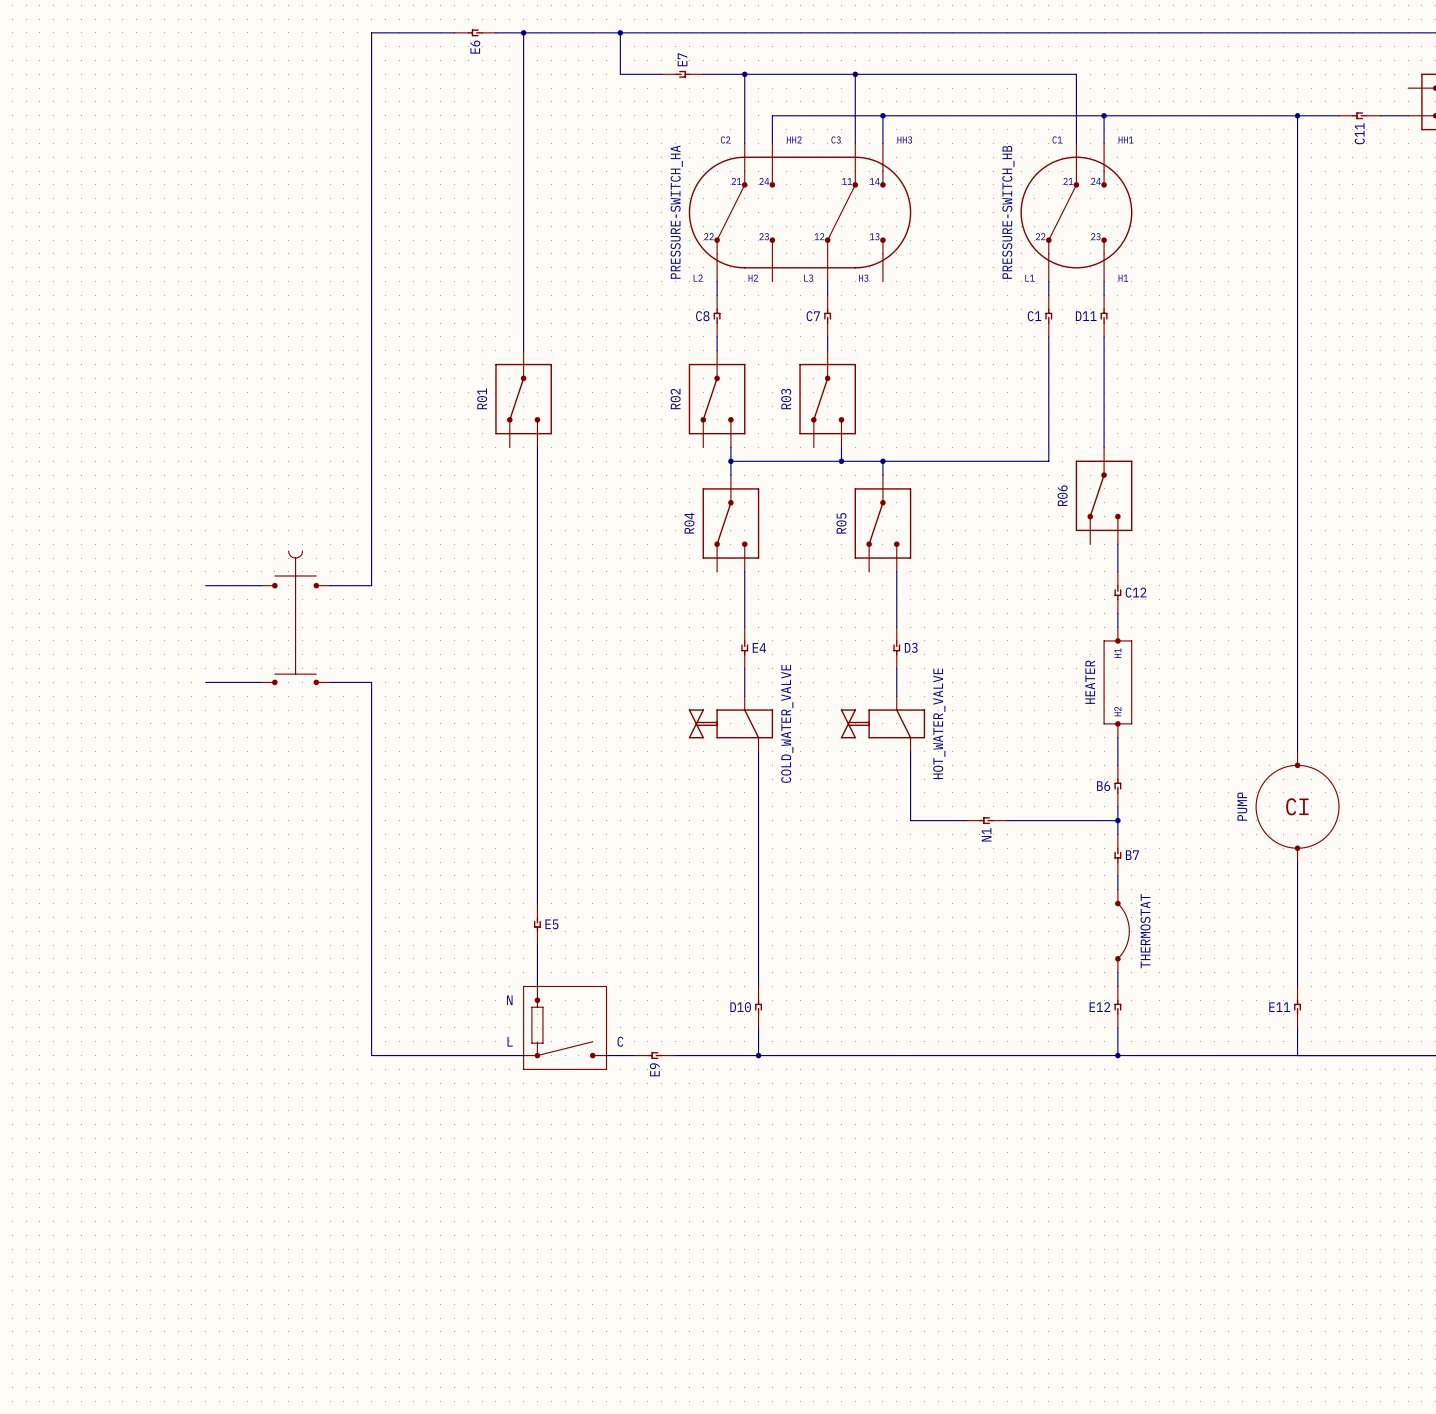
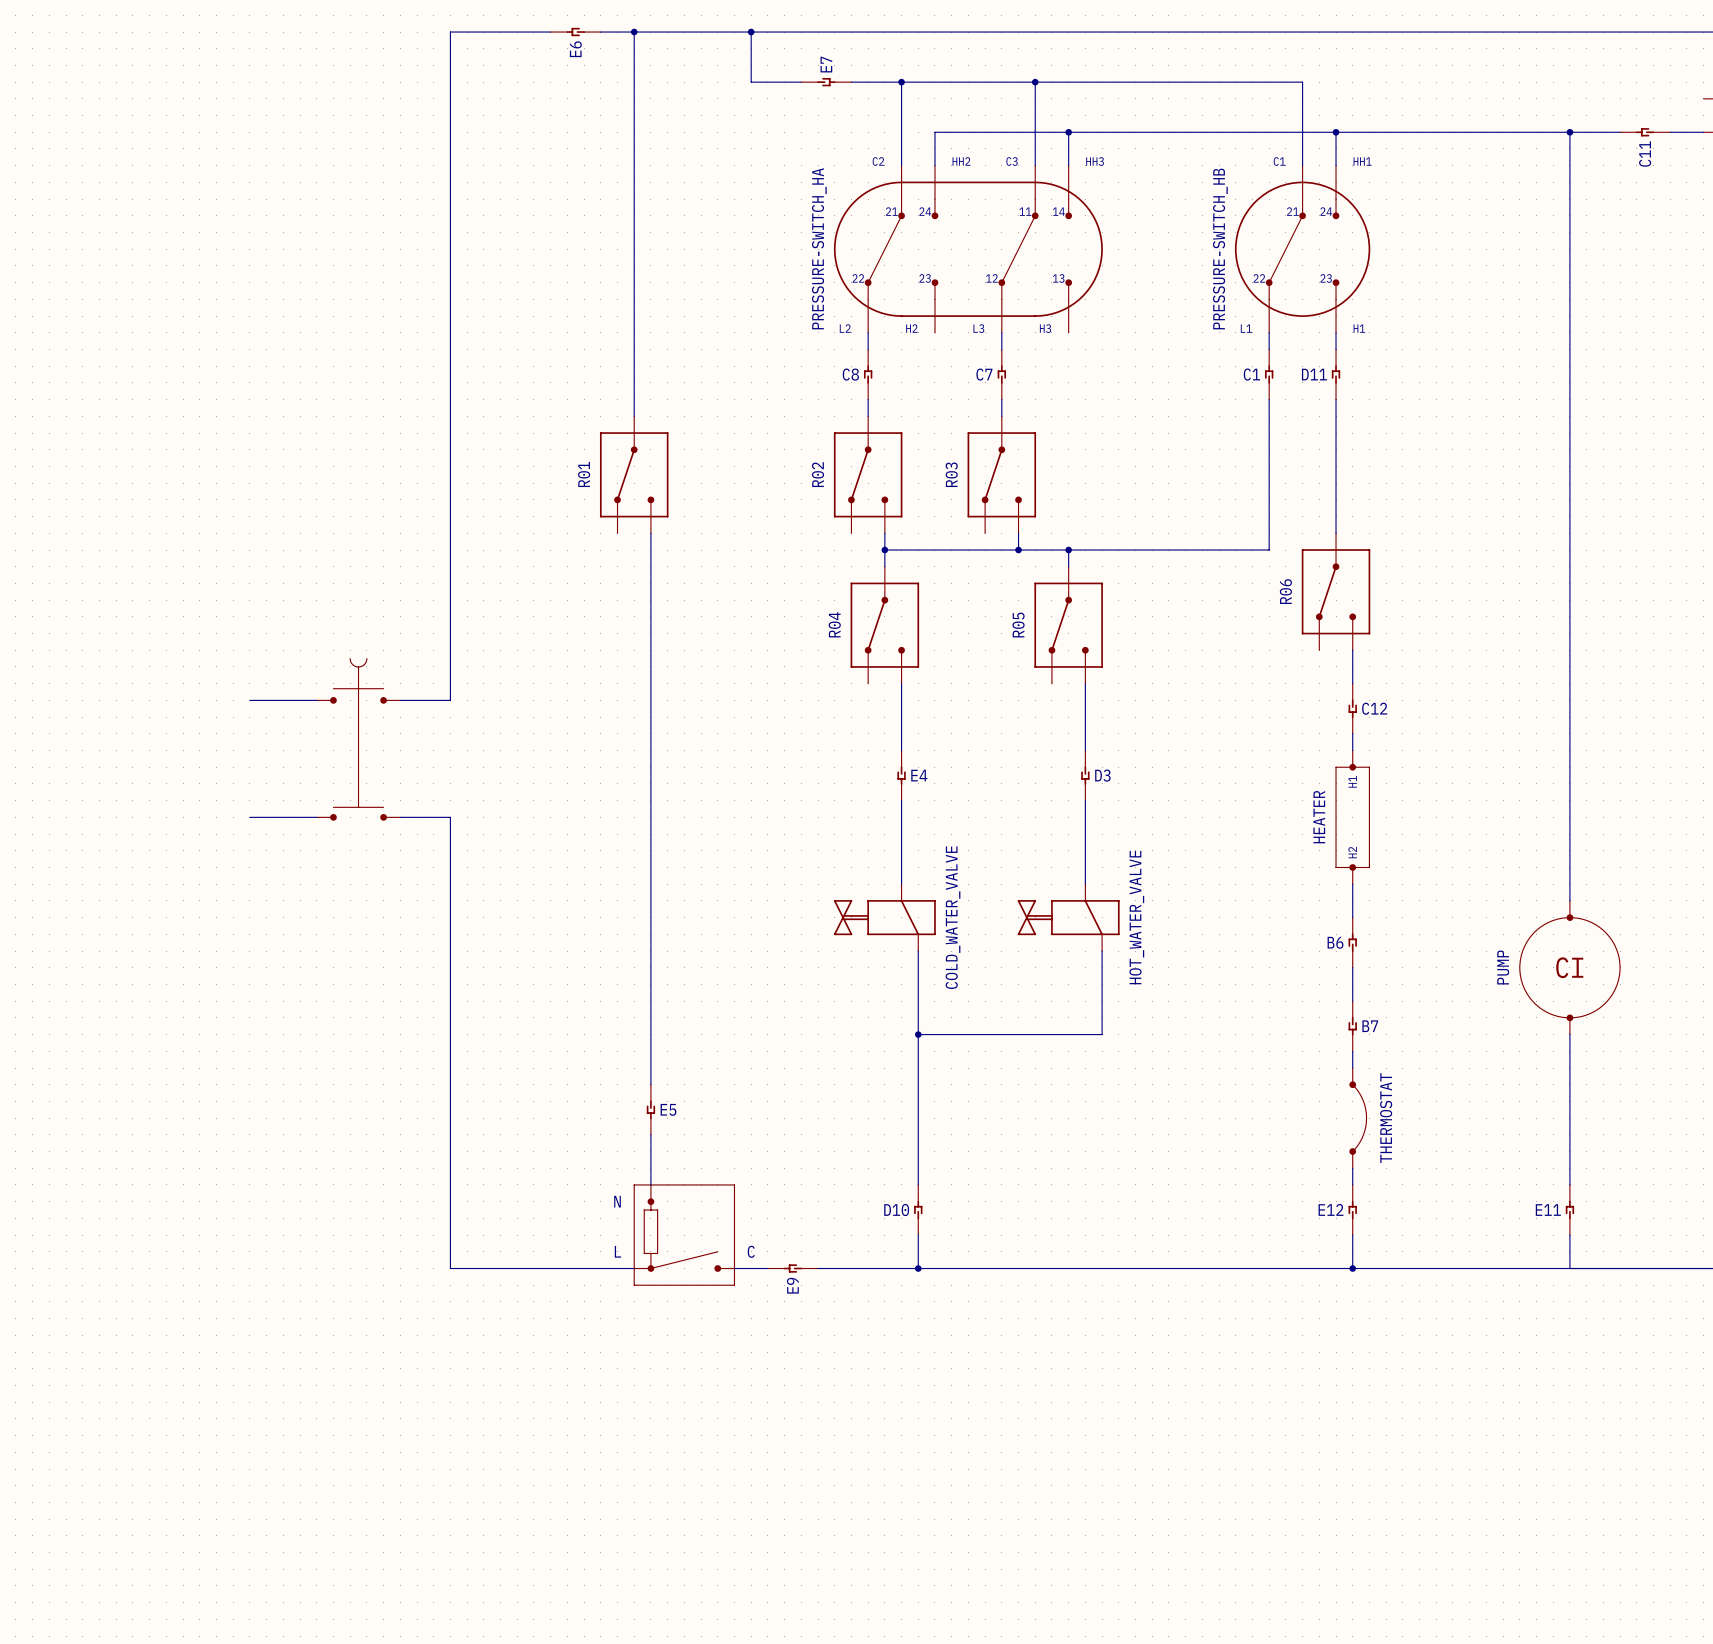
COLD_WATER_VALVE position: (730, 723) -> (884, 917)
HOT_WATER_VALVE position: (882, 723) -> (1068, 917)
wire: (758, 751) (758, 792) -> (901, 834) (901, 884)
wire: (910, 751) (910, 792) -> (1085, 834) (1085, 884)
wire: (910, 820) (965, 820) -> (1102, 984) (1102, 1034) (918, 1034)
N1: (986, 820) -> none
wire: (1007, 820) (1117, 820) -> none
junction: (1117, 820) -> none
junction: none -> (918, 1034)

